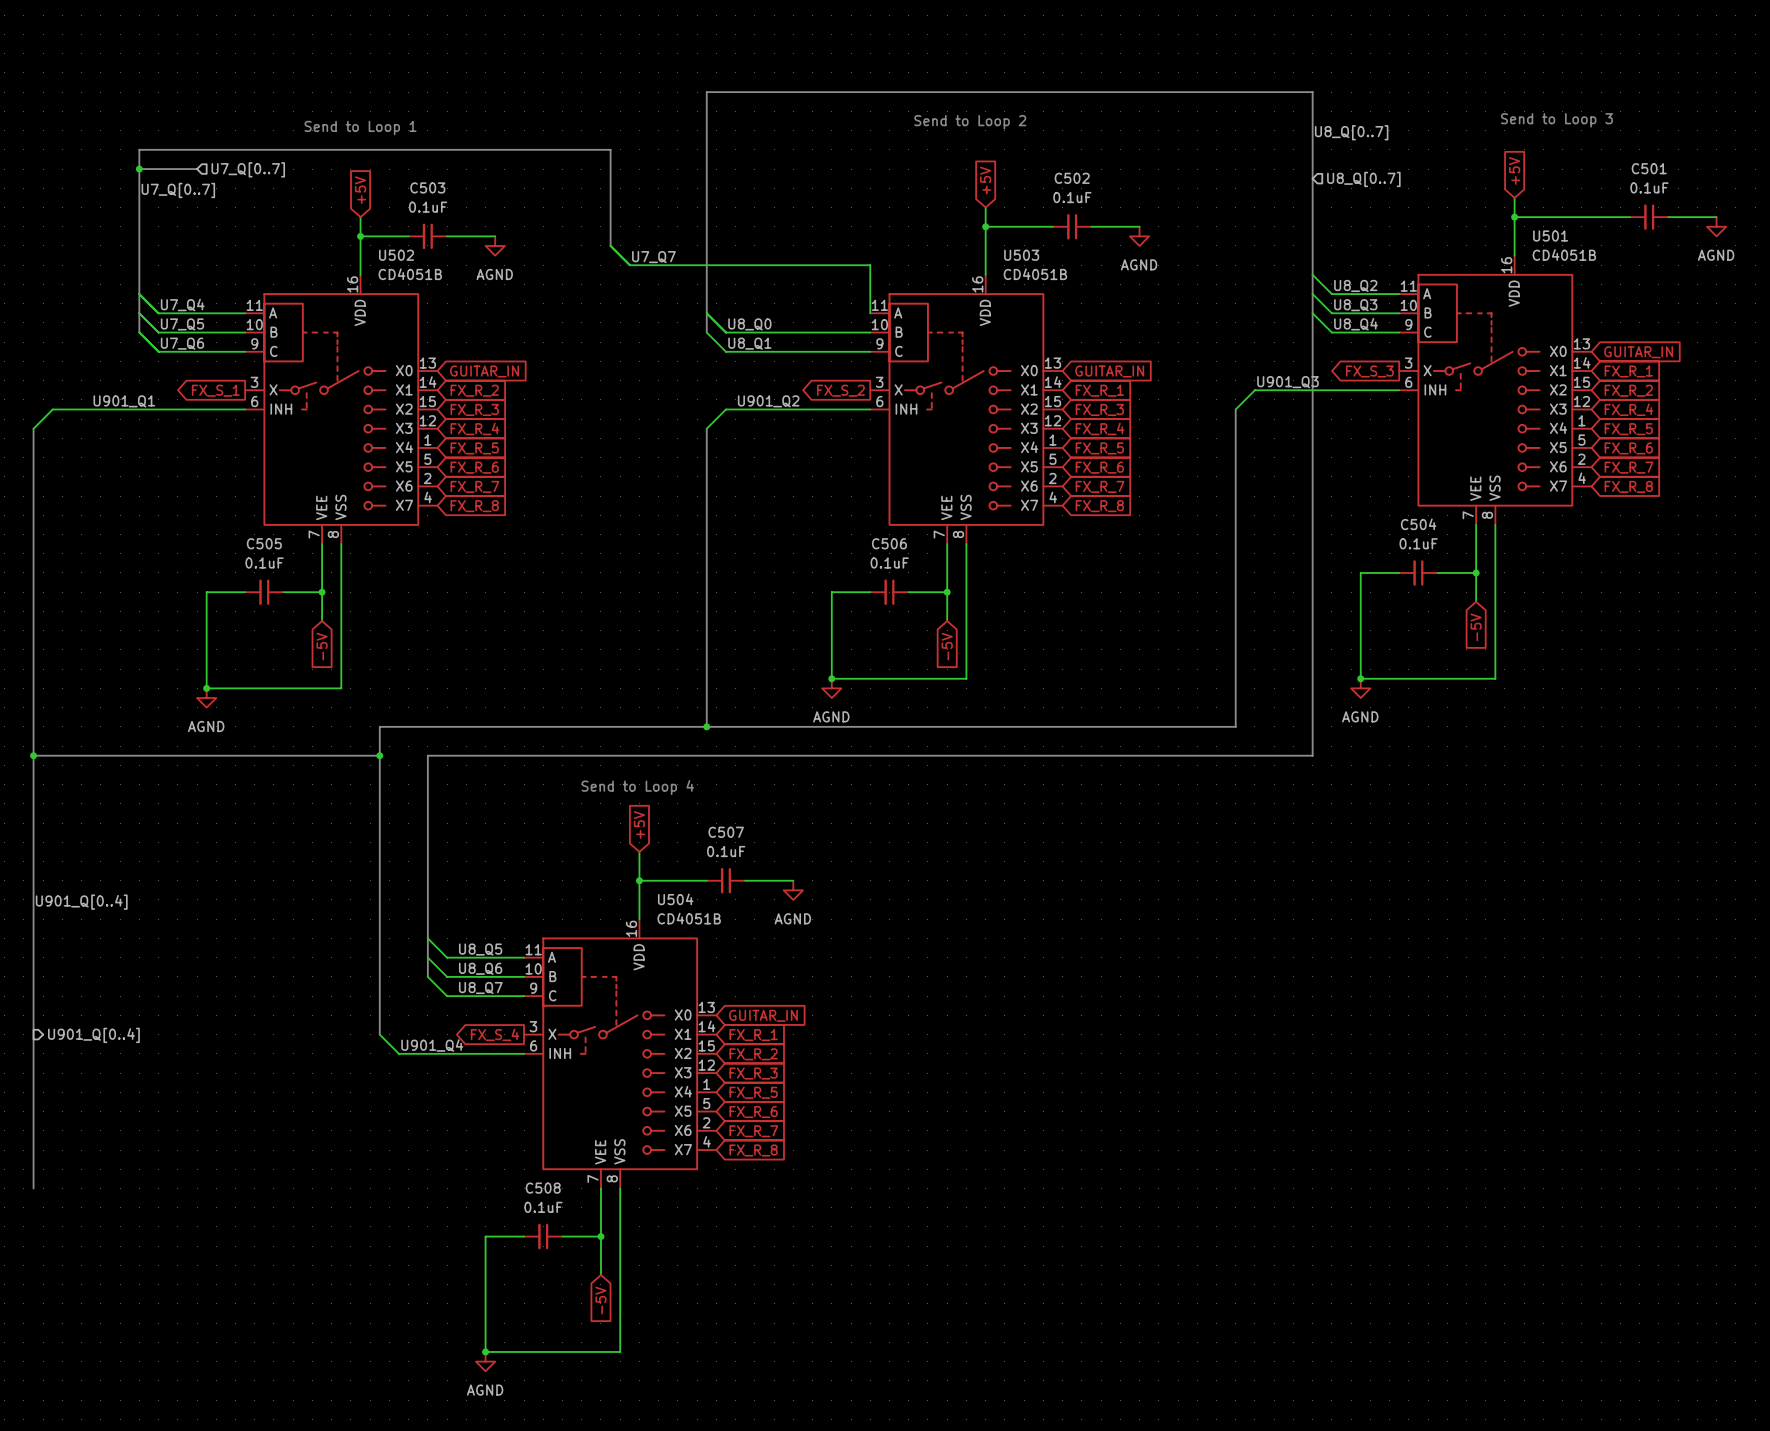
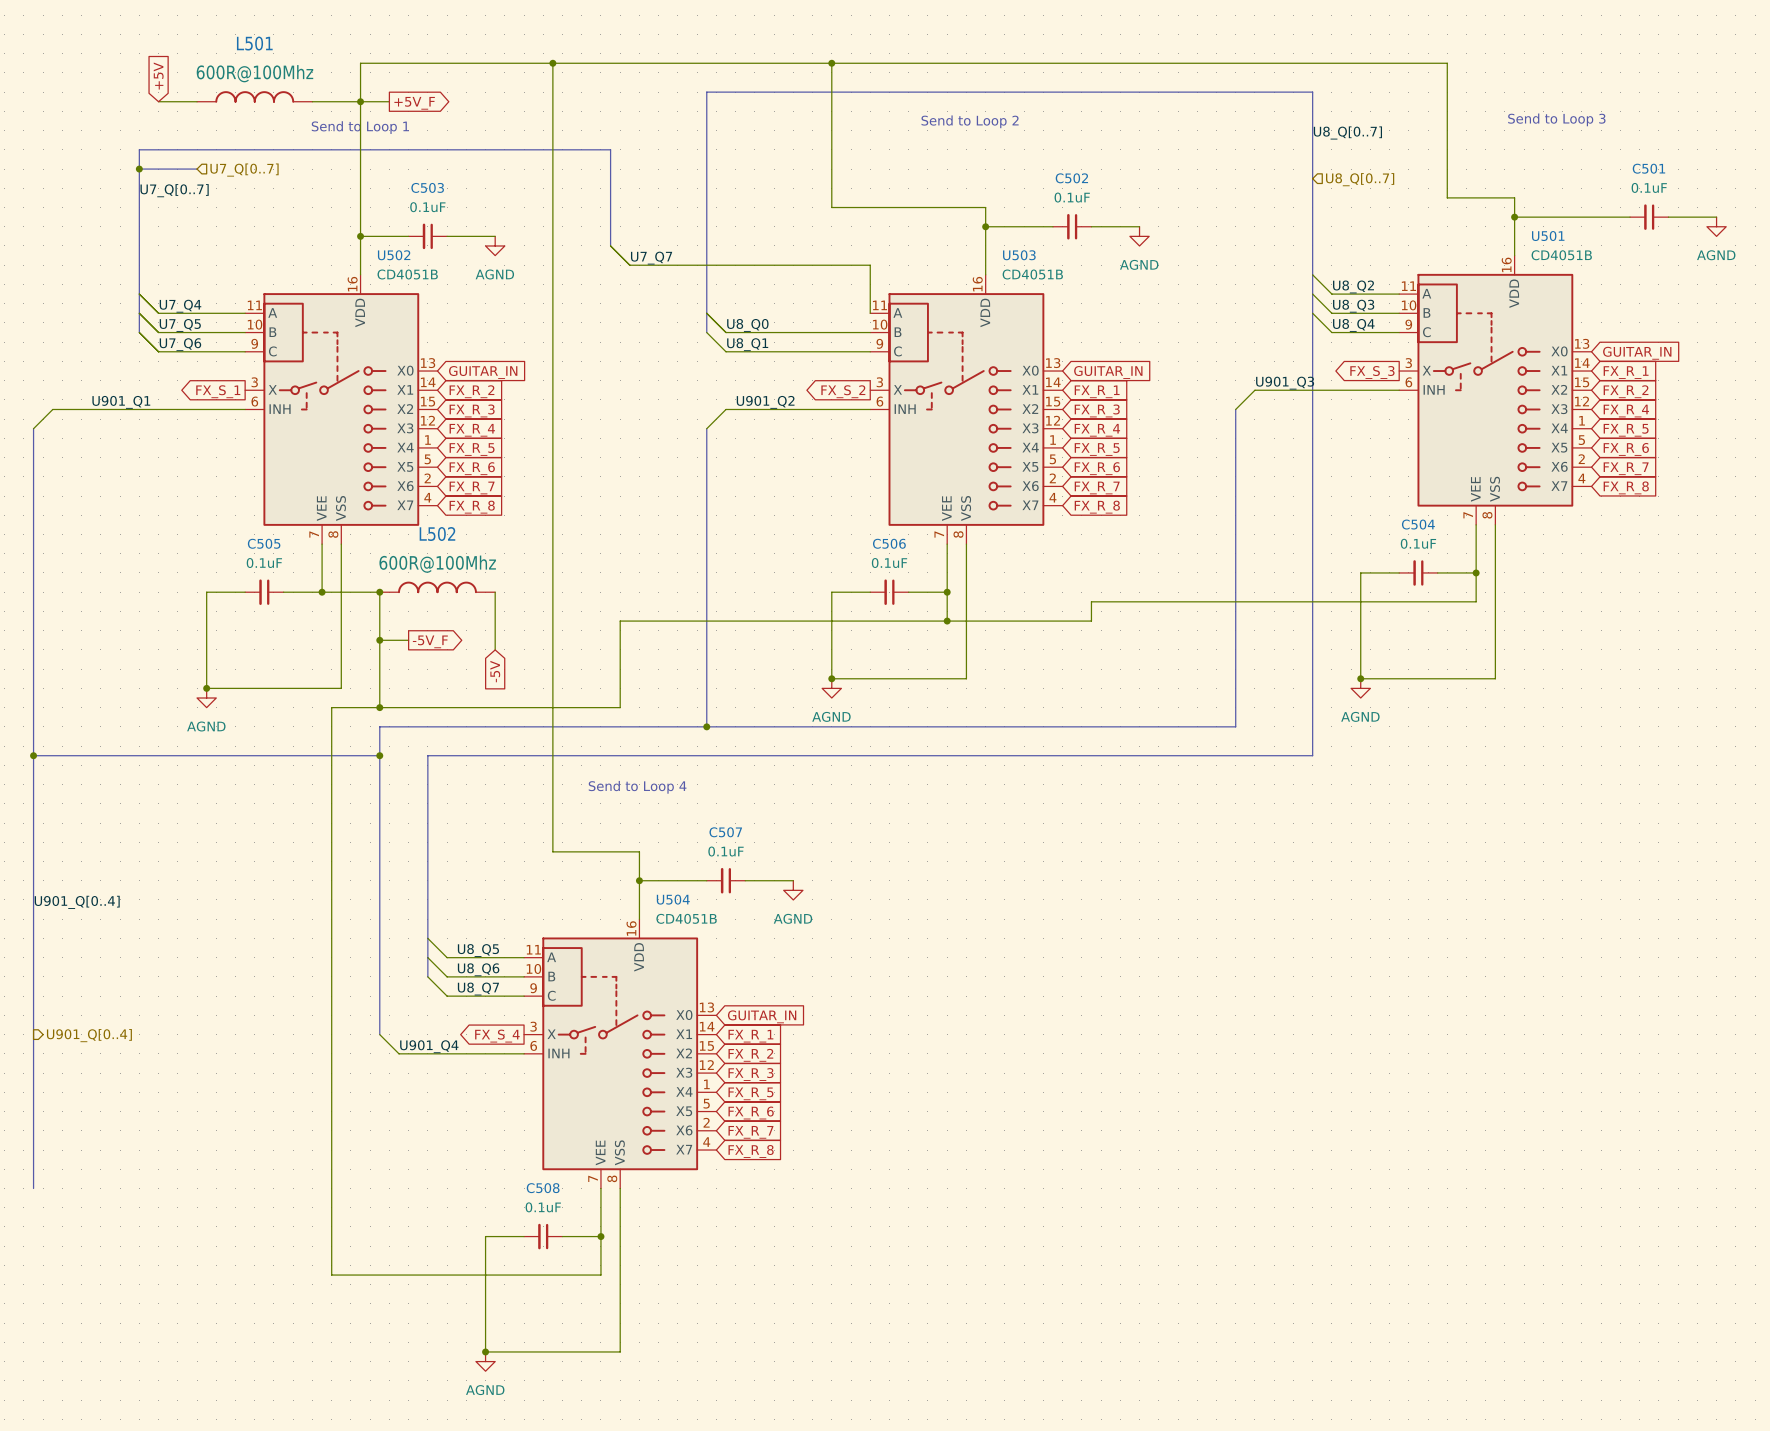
wire: none -> (552, 63) (552, 851) (639, 851)
junction: none -> (552, 63)
wire: none -> (831, 63) (831, 207) (985, 207)
junction: none -> (831, 63)
global label: none -> +5V (158, 76)
L501: none -> 600R@100Mhz (254, 96)
wire: none -> (158, 101) (197, 101)
wire: none -> (312, 101) (389, 101)
junction: none -> (360, 101)
global label: none -> +5V_F (414, 103)
global label: +5V (1514, 170) -> none
global label: +5V (985, 180) -> none
global label: +5V (360, 190) -> none
wire: none -> (1514, 197) (1447, 197) (1447, 63) (360, 63) (360, 217)
L502: none -> 600R@100Mhz (437, 587)
wire: (322, 592) (322, 621) -> (322, 592) (379, 592) (379, 707)
junction: none -> (379, 592)
wire: none -> (495, 592) (495, 649)
wire: none -> (1476, 601) (1091, 601) (1091, 621) (620, 621) (620, 707) (331, 707) (331, 1275) (600, 1275)
junction: none -> (947, 621)
global label: -5V (1476, 627) -> none
wire: none -> (379, 640) (408, 640)
junction: none -> (379, 640)
global label: none -> -5V_F (430, 641)
global label position: -5V (322, 646) -> -5V (495, 671)
global label: -5V (947, 646) -> none
junction: none -> (379, 707)
global label: +5V (639, 824) -> none
global label: -5V (600, 1300) -> none

